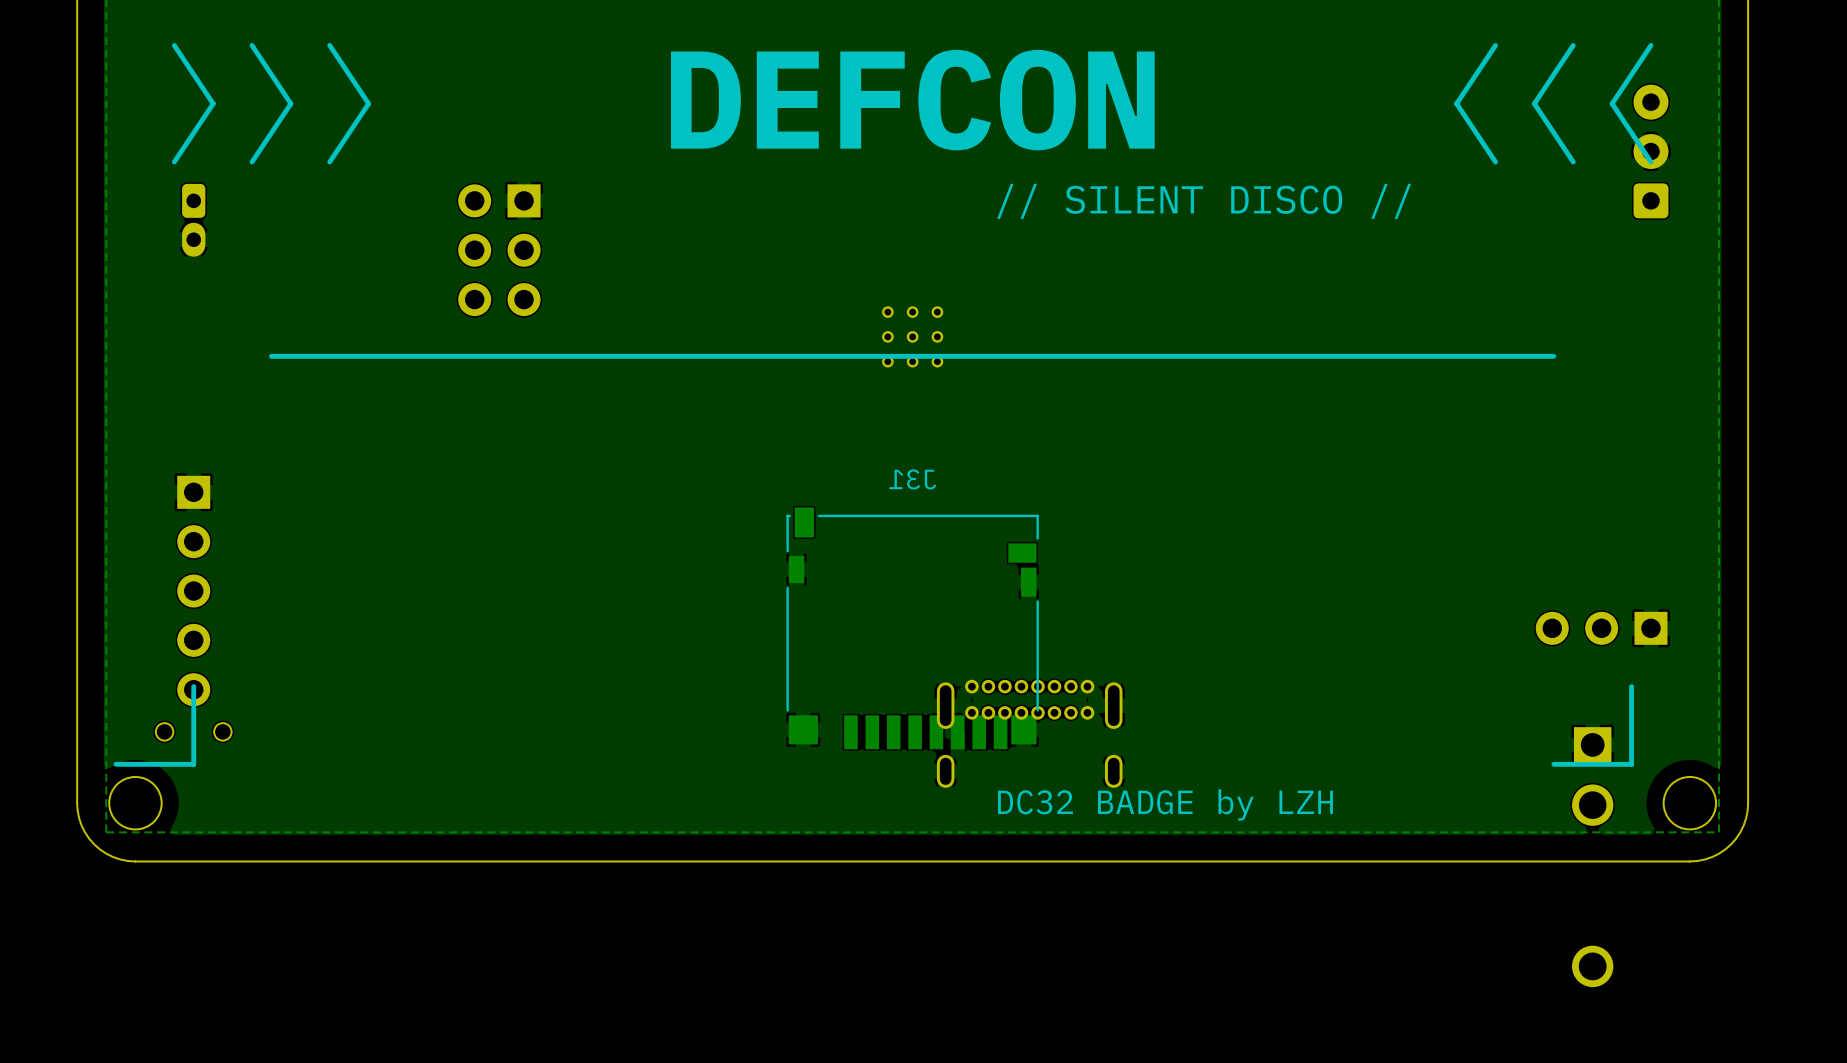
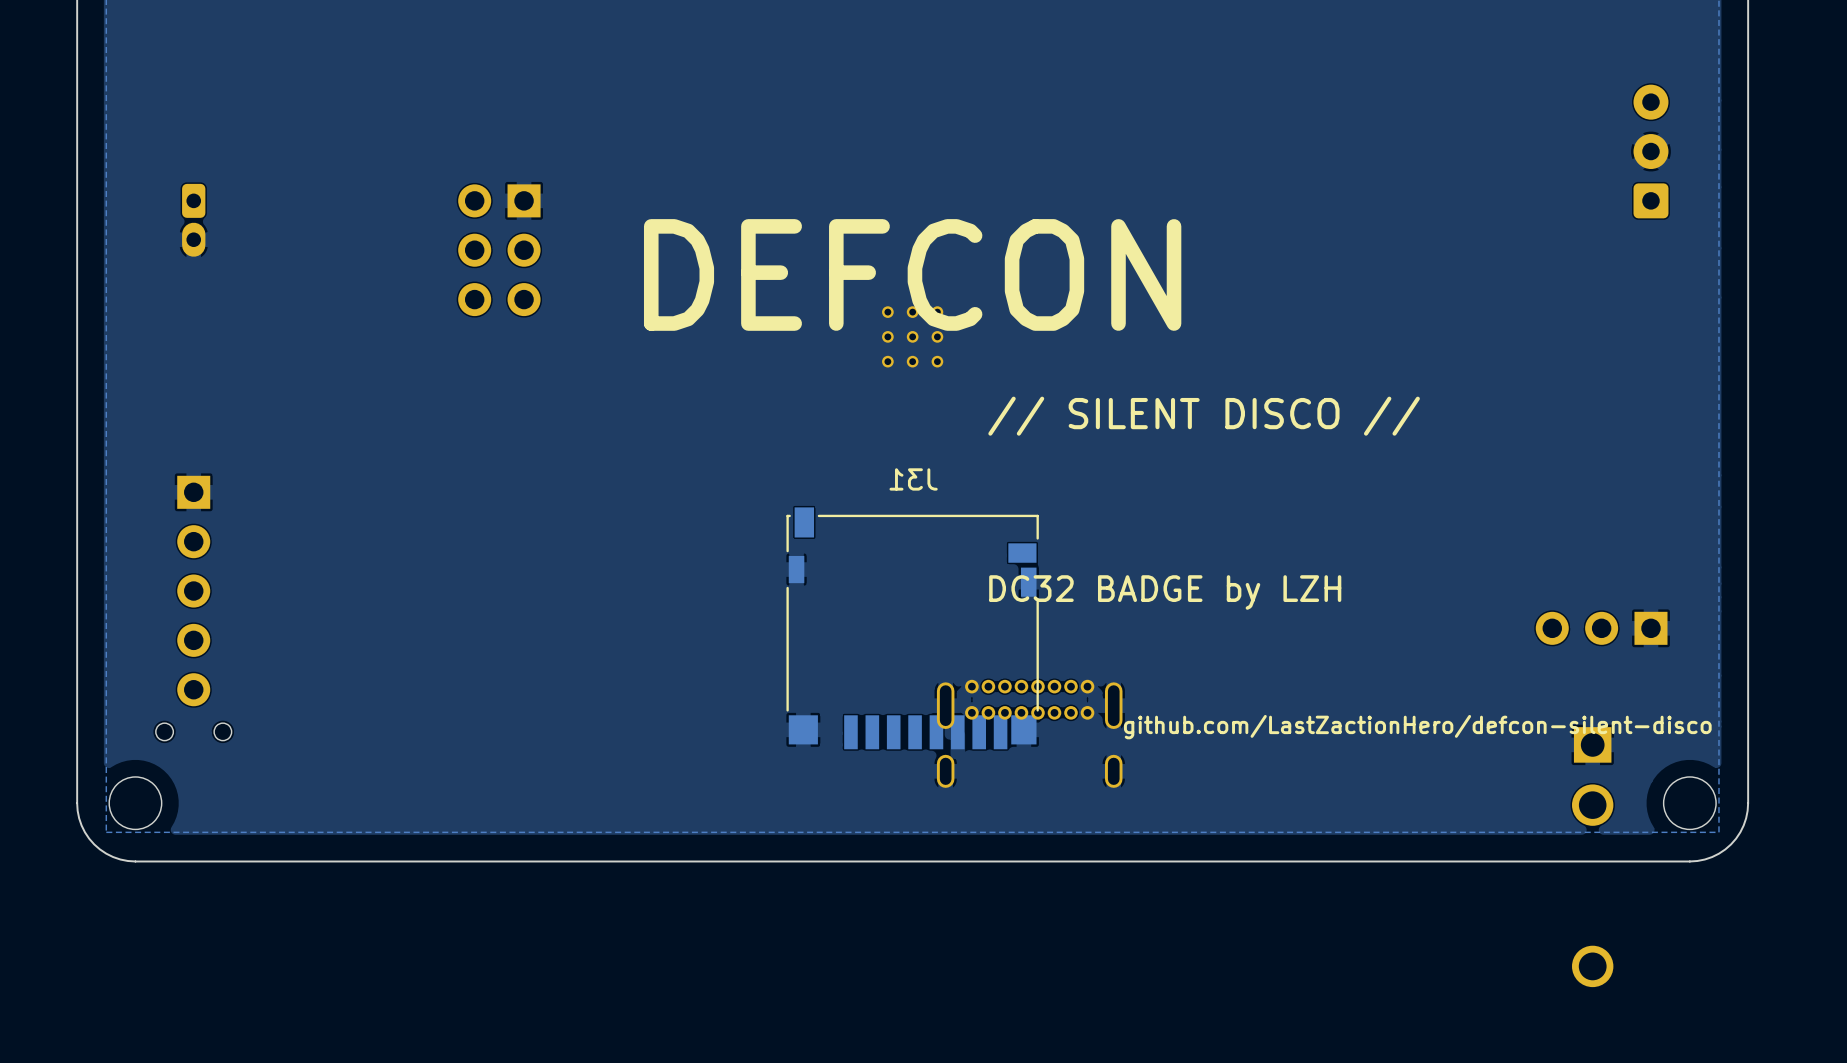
line: (174, 45) (213, 103) (174, 162) -> none
line: (252, 45) (290, 103) (252, 162) -> none
line: (329, 45) (368, 103) (329, 162) -> none
line: (1495, 45) (1456, 103) (1495, 162) -> none
line: (1573, 45) (1534, 103) (1573, 162) -> none
line: (1650, 45) (1612, 103) (1650, 162) -> none
text position: DEFCON (912, 100) -> DEFCON (912, 274)
text position: // SILENT DISCO // (1204, 201) -> // SILENT DISCO // (1204, 416)
line: (1553, 356) (271, 356) -> none
line: (193, 686) (193, 764) (116, 764) -> none
line: (1631, 686) (1631, 764) (1553, 764) -> none
text: none -> github.com/LastZactionHero/defcon-silent-disco (1417, 727)
text position: DC32 BADGE by LZH (1165, 804) -> DC32 BADGE by LZH (1165, 592)

